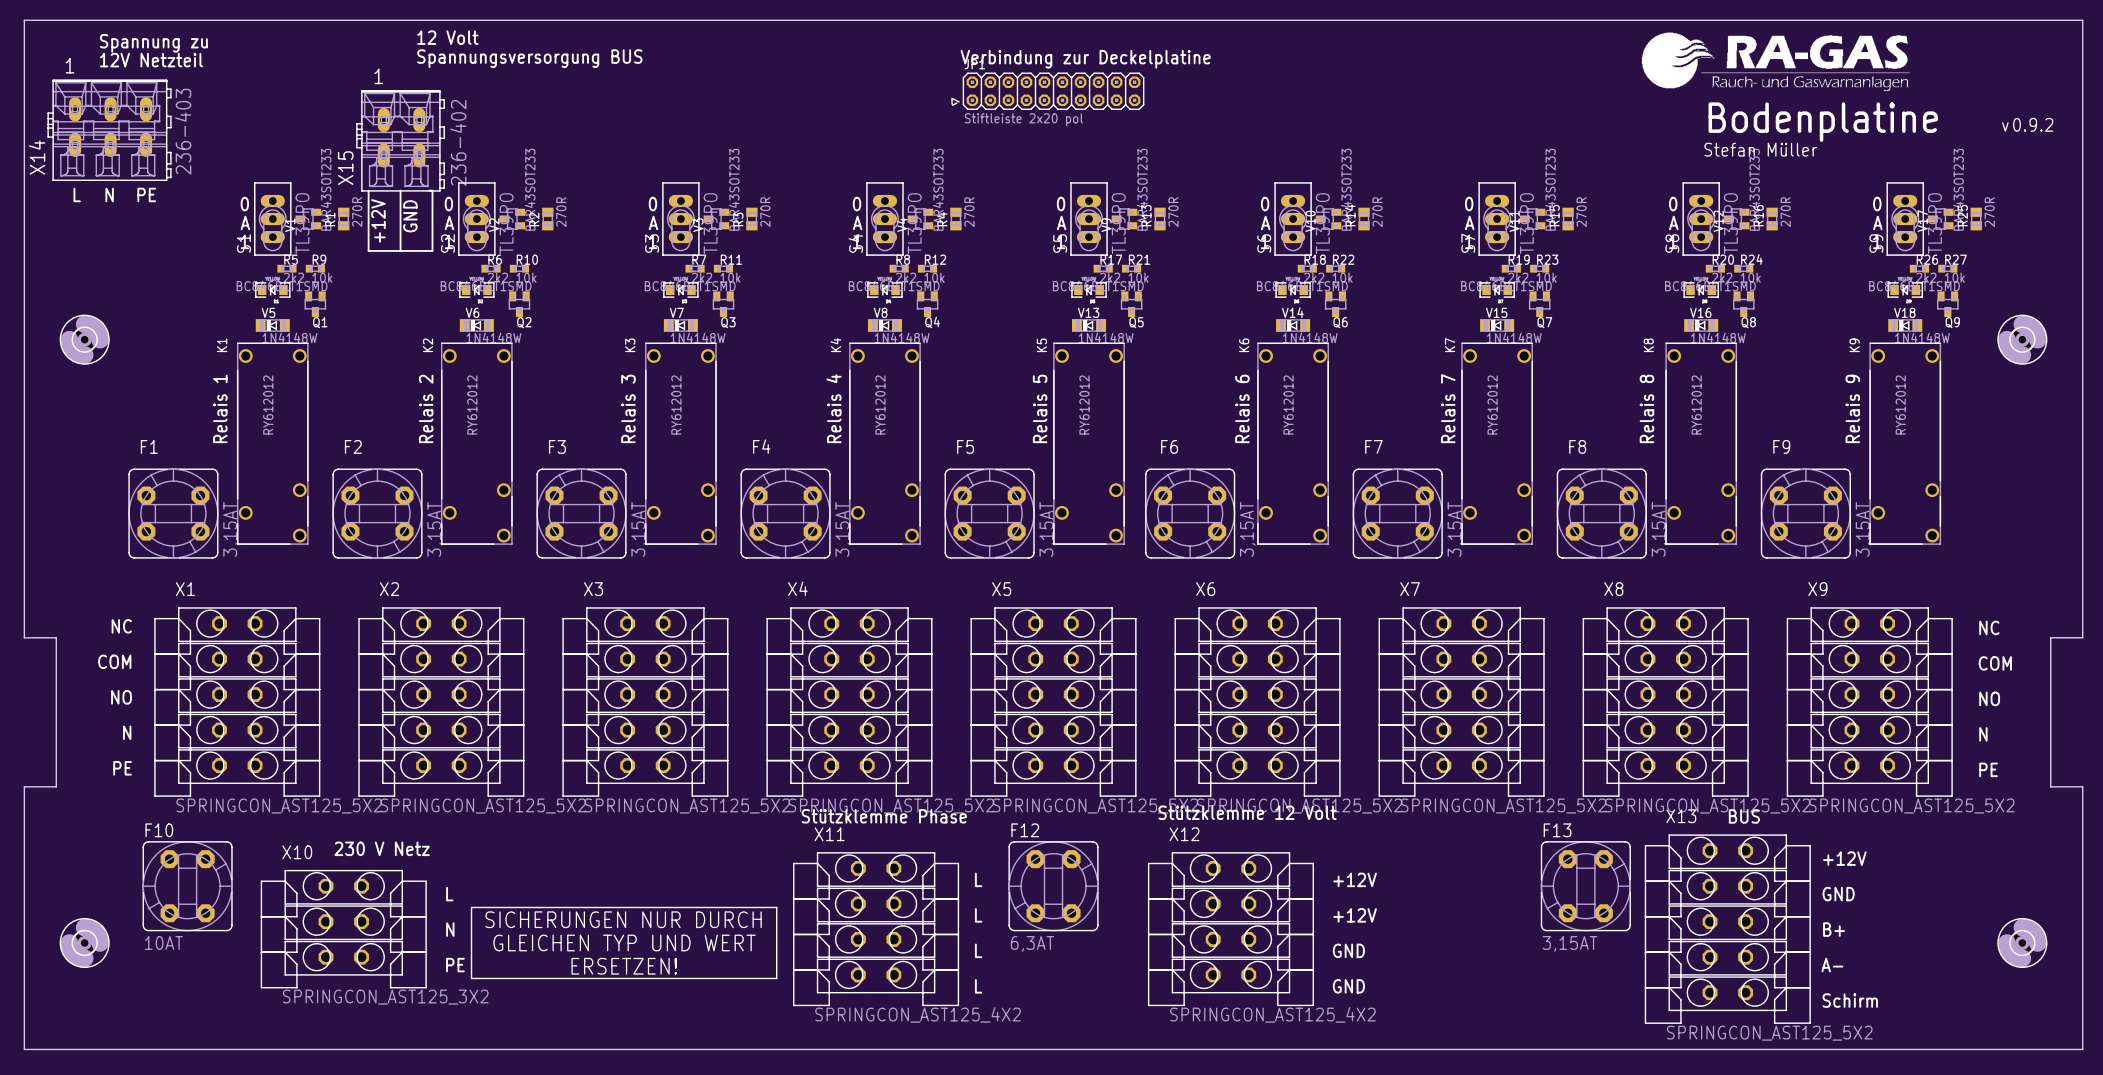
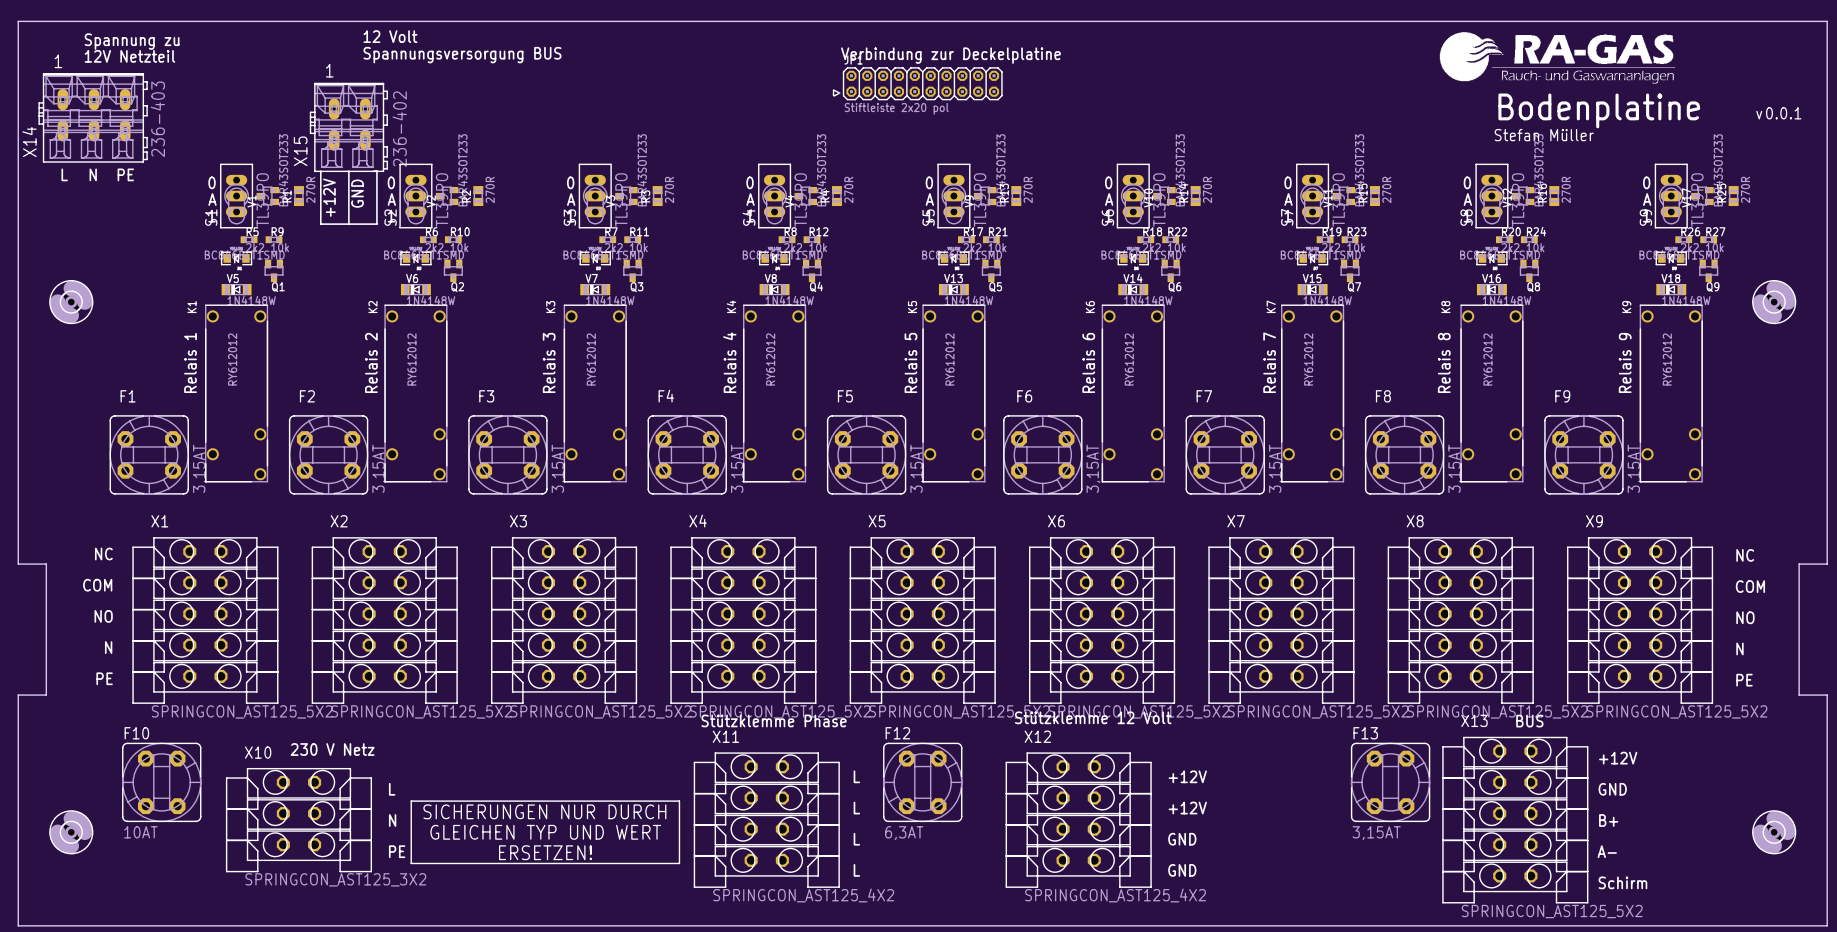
drawing shape: [1704, 102, 2054, 157] -> [1494, 93, 1802, 142]

